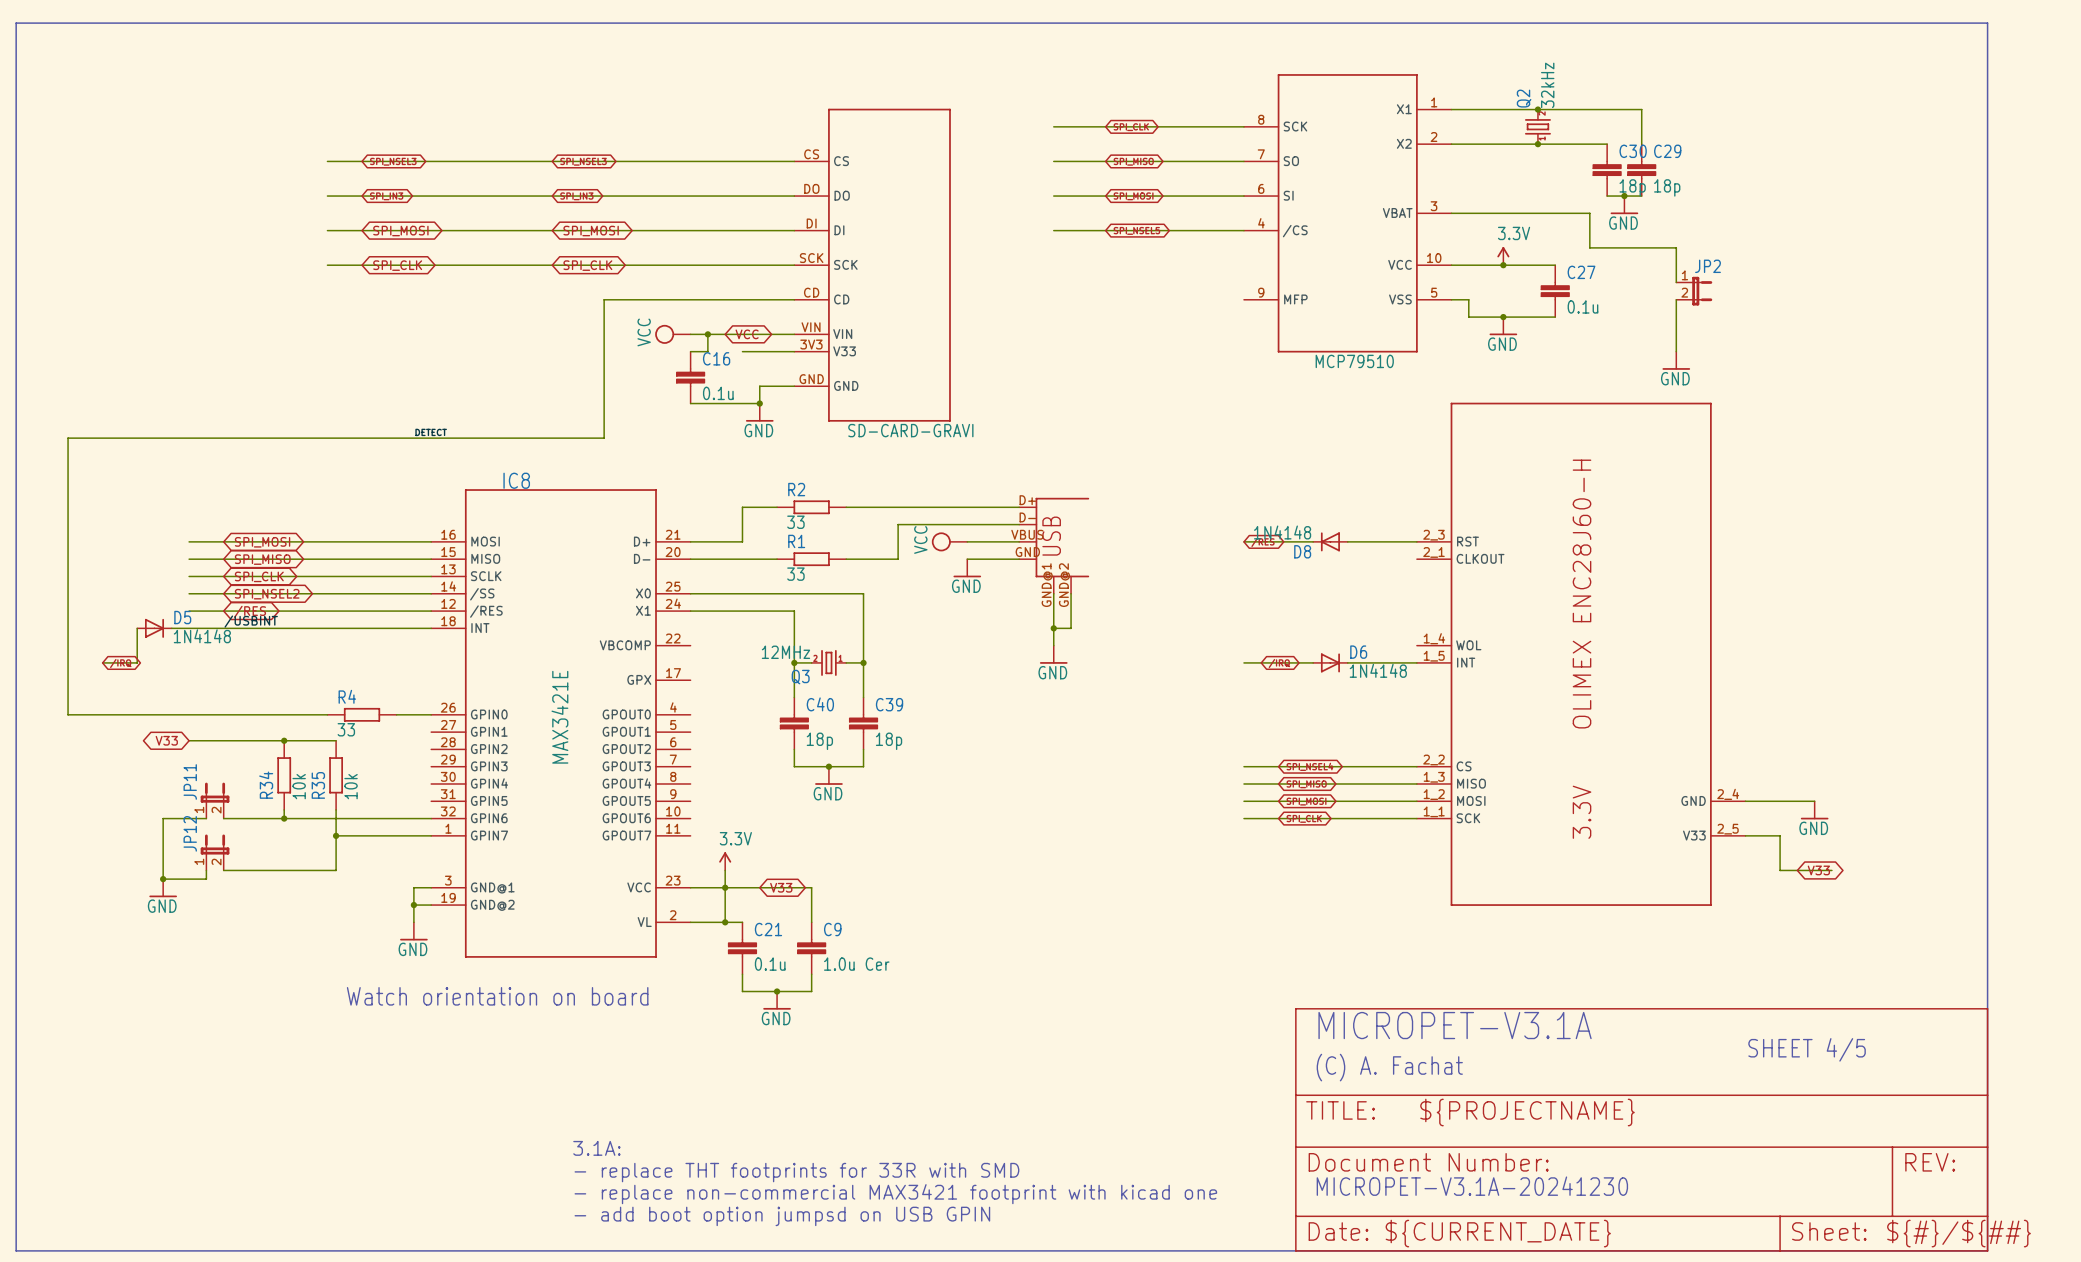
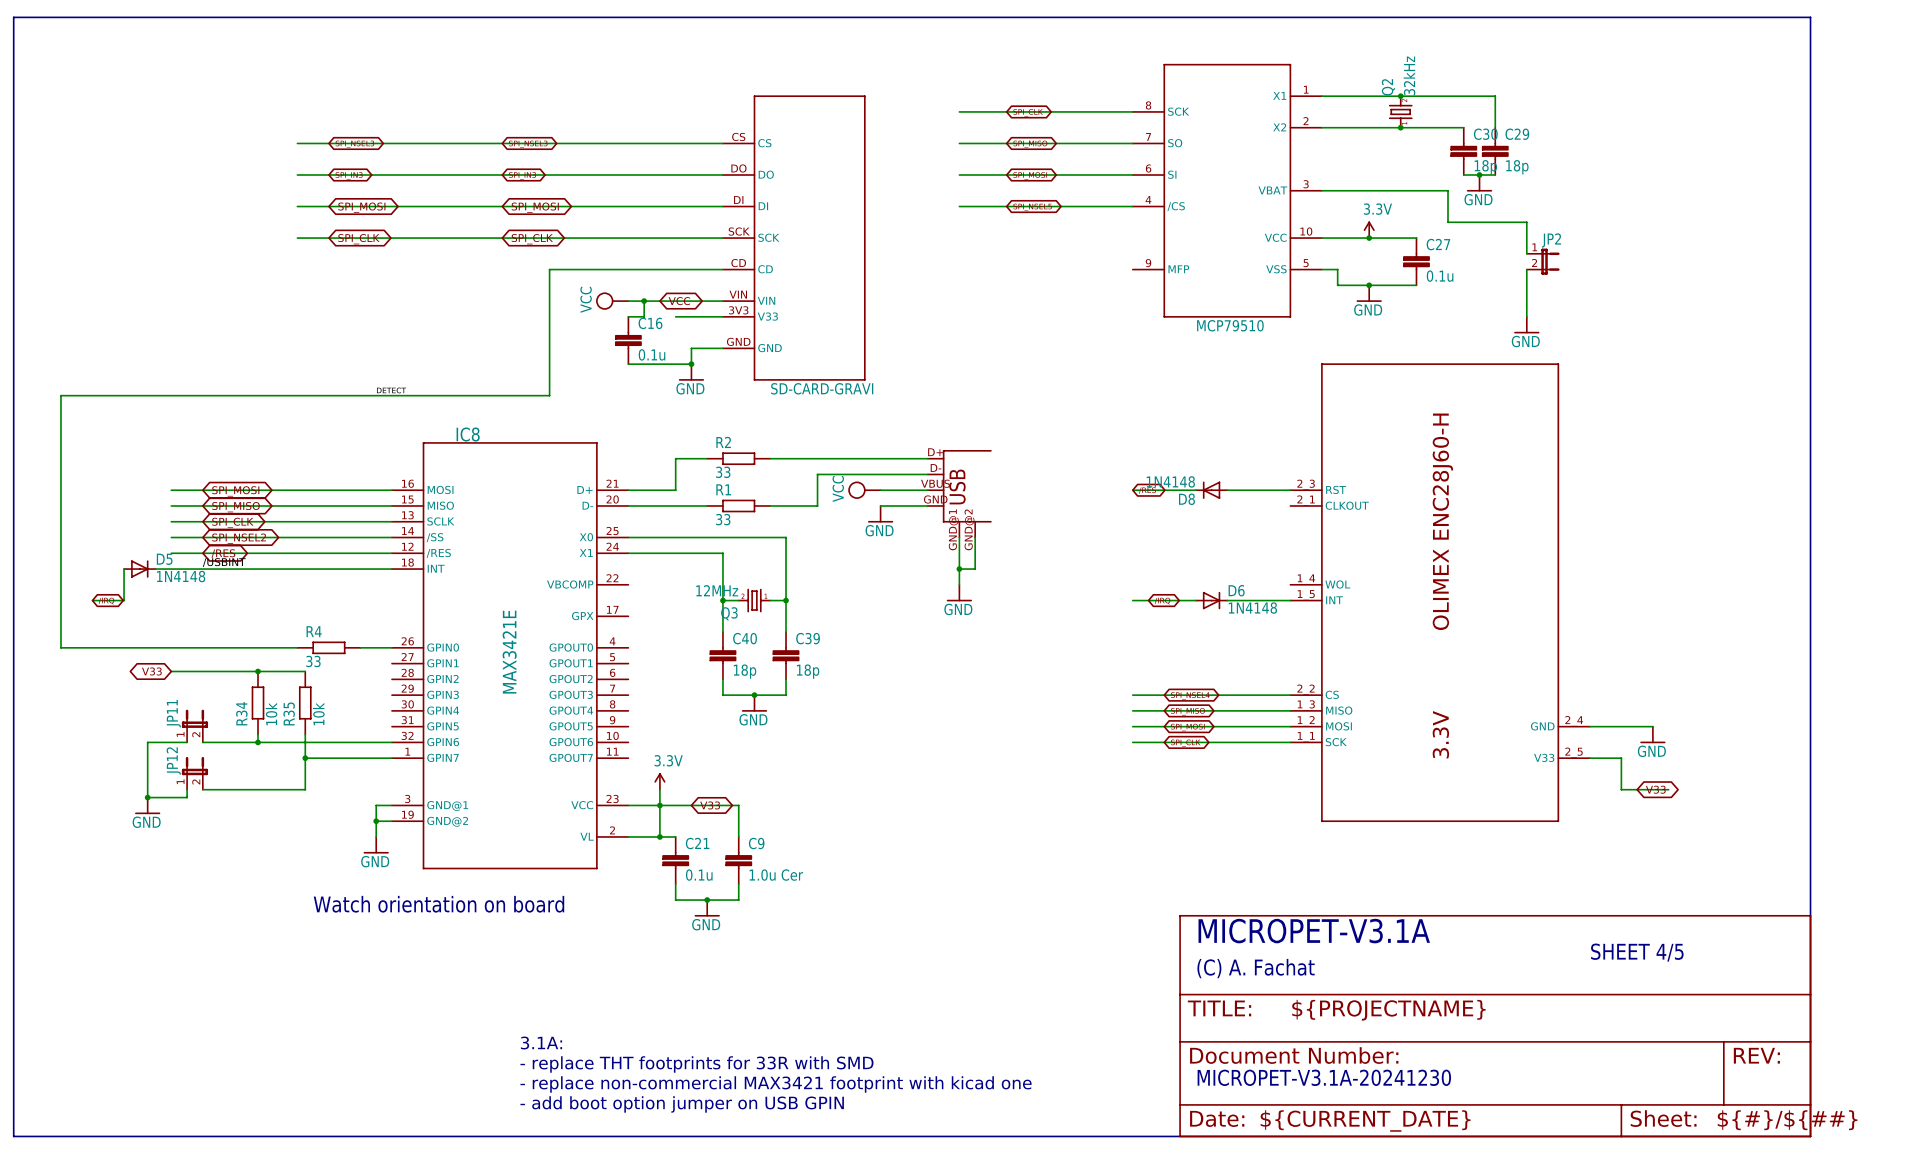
text: - add boot option jumpsd on USB GPIN (782, 1216) -> - add boot option jumper on USB GPIN (682, 1104)

